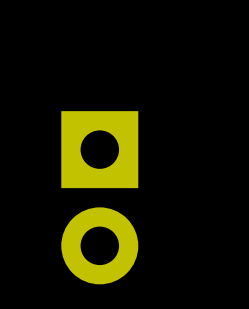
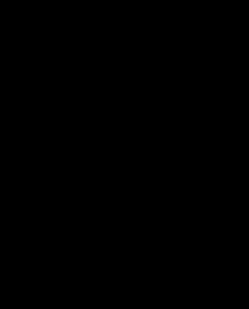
part: (99, 197) -> none

